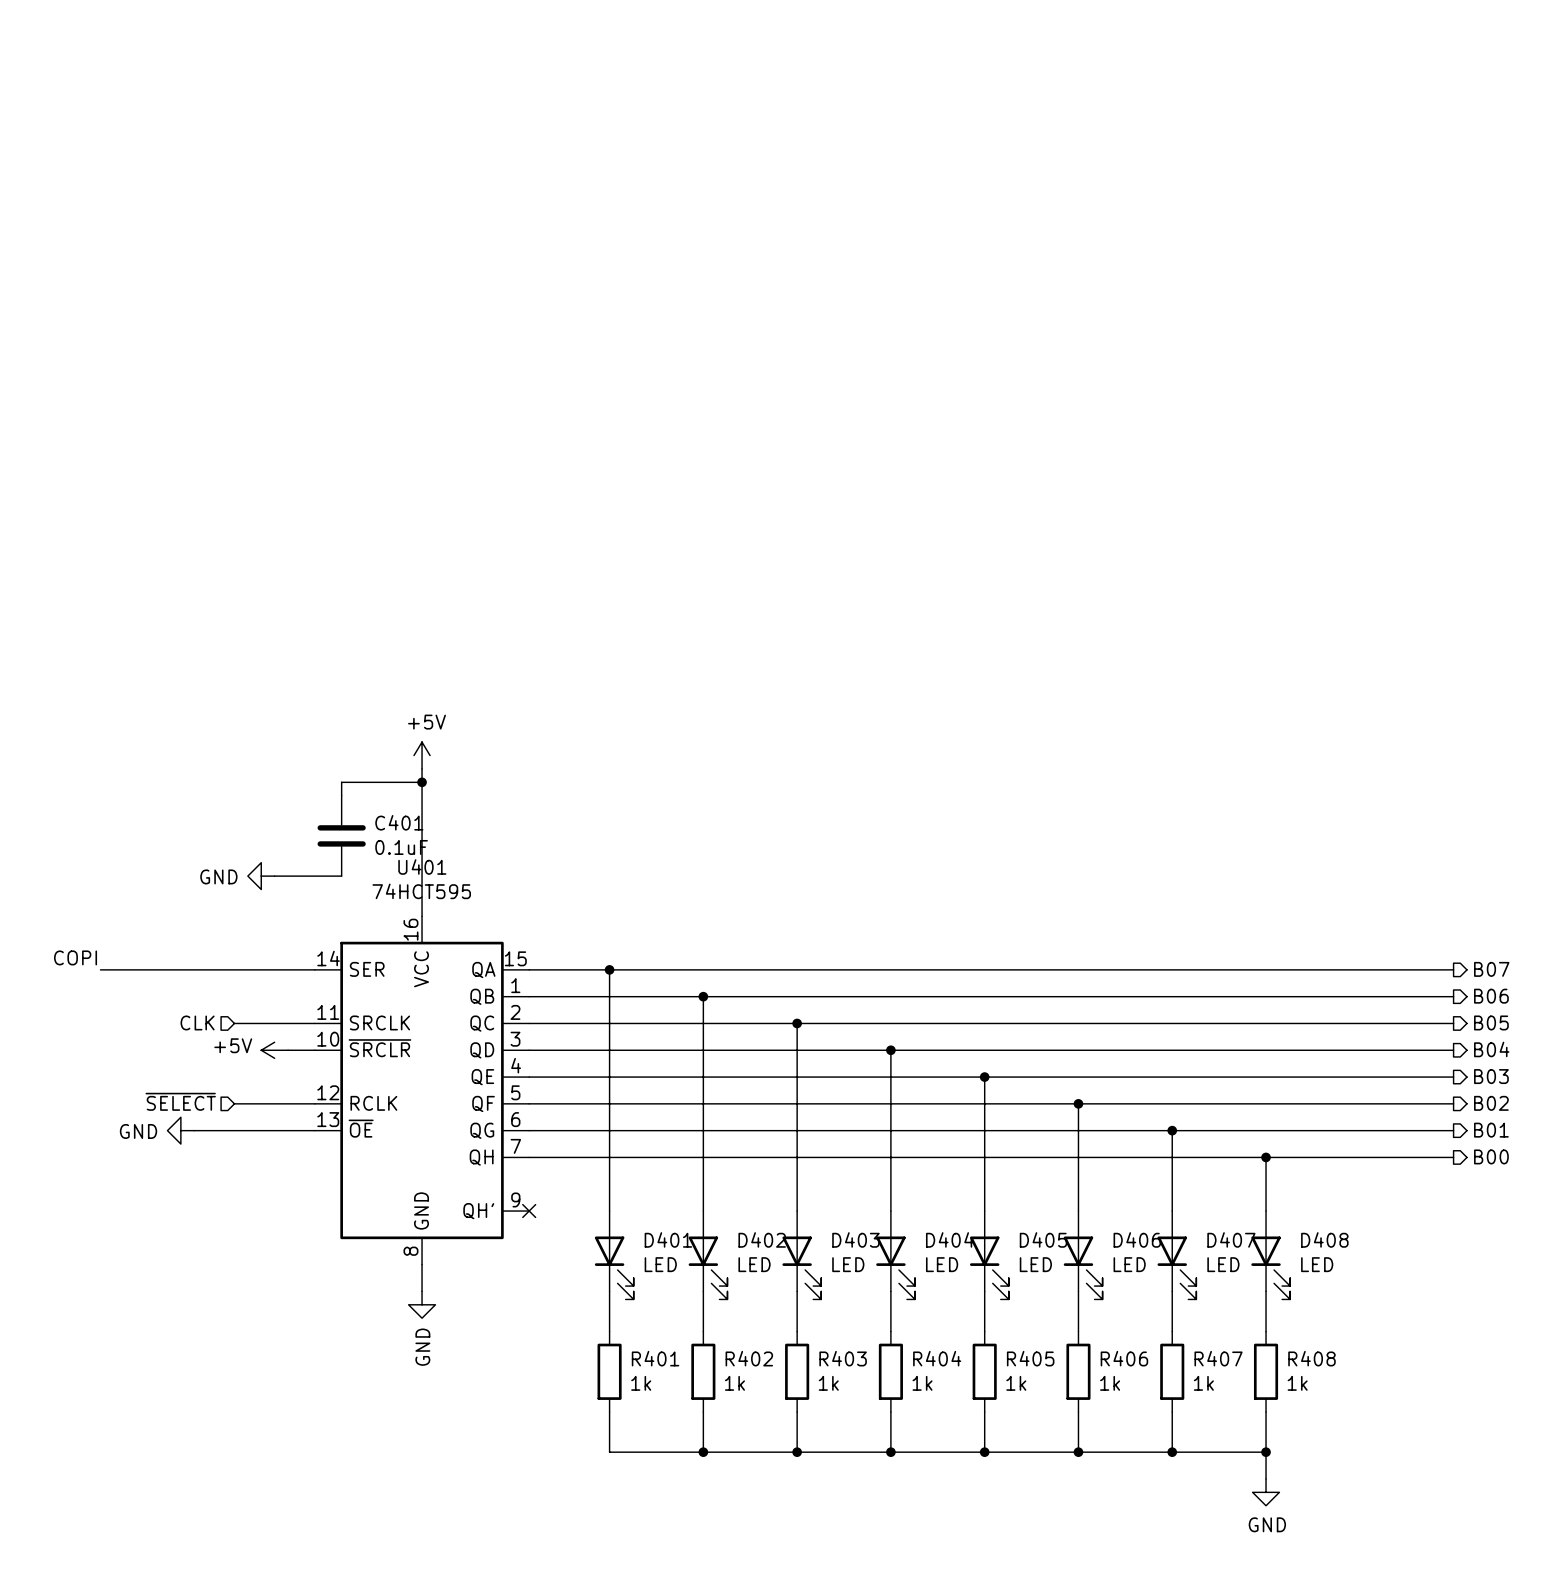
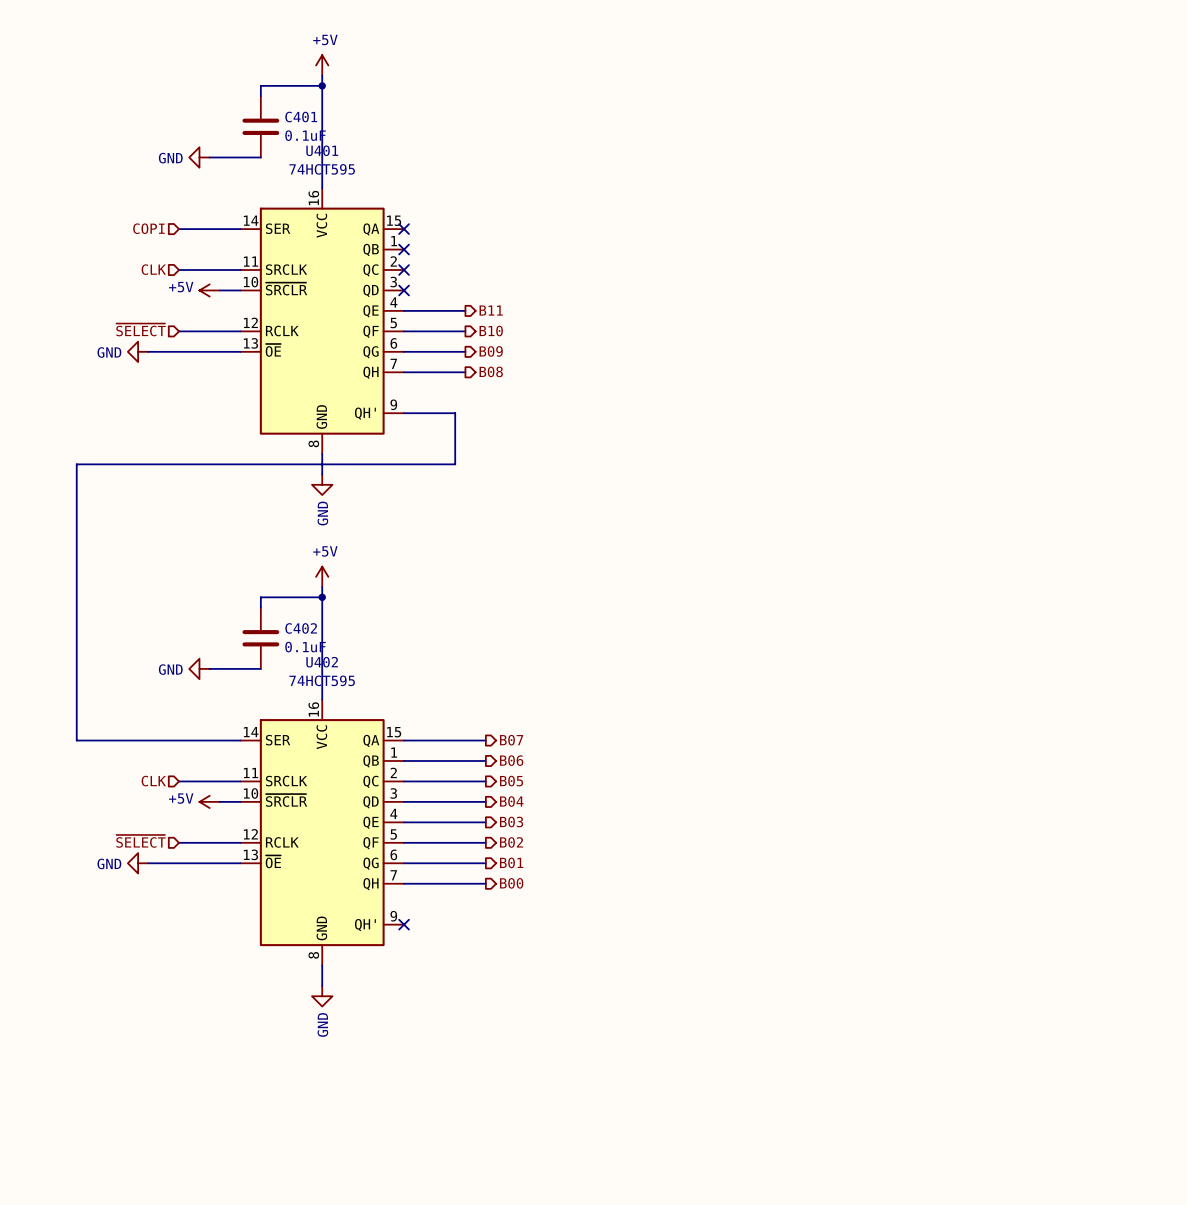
power symbol: none -> +5V (322, 65)
wire: none -> (322, 75) (322, 188)
wire: none -> (322, 85) (260, 85) (260, 96)
junction: none -> (322, 85)
C401: none -> 0.1uF (260, 126)
power symbol: none -> GND (199, 157)
wire: none -> (209, 157) (260, 157)
hierarchical label: none -> COPI (148, 228)
wire: none -> (179, 229) (240, 229)
no-connect mark: none -> (404, 229)
no-connect mark: none -> (404, 249)
hierarchical label: none -> CLK (153, 269)
wire: none -> (179, 270) (240, 270)
no-connect mark: none -> (404, 270)
power symbol: none -> +5V (209, 290)
wire: none -> (219, 290) (240, 290)
no-connect mark: none -> (404, 290)
hierarchical label: none -> B11 (491, 310)
wire: none -> (404, 310) (465, 310)
U401: none -> 74HCT595 (322, 321)
hierarchical label: none -> ~{SELECT} (141, 329)
hierarchical label: none -> B10 (491, 331)
wire: none -> (179, 331) (240, 331)
wire: none -> (404, 331) (465, 331)
power symbol: none -> GND (138, 351)
wire: none -> (148, 351) (240, 351)
wire: none -> (404, 351) (465, 351)
hierarchical label: none -> B09 (491, 351)
wire: none -> (404, 372) (465, 372)
hierarchical label: none -> B08 (491, 371)
wire: none -> (404, 413) (455, 413) (455, 464) (76, 464) (76, 740)
wire: none -> (322, 454) (322, 474)
power symbol: none -> GND (322, 484)
C401 name: C401 (399, 822) -> C402 (301, 628)
U401 name: U401 (422, 866) -> U402 (322, 662)
label: COPI (75, 957) -> none
wire: (609, 969) (609, 1211) -> none
junction: (609, 969) -> none
wire: (636, 969) (1453, 969) -> none
hierarchical label: none -> B07 (511, 740)
hierarchical label: B07 (1491, 969) -> none
wire: (636, 996) (1453, 996) -> none
hierarchical label: none -> B06 (511, 760)
wire: (703, 996) (703, 1211) -> none
junction: (703, 996) -> none
hierarchical label: B06 (1491, 996) -> none
hierarchical label: none -> B05 (511, 781)
hierarchical label: B05 (1491, 1022) -> none
wire: (636, 1023) (1453, 1023) -> none
wire: (797, 1023) (797, 1211) -> none
junction: (797, 1023) -> none
hierarchical label: none -> B04 (511, 801)
hierarchical label: B04 (1491, 1049) -> none
wire: (636, 1050) (1453, 1050) -> none
wire: (890, 1050) (890, 1211) -> none
junction: (890, 1050) -> none
hierarchical label: none -> B03 (511, 821)
hierarchical label: B03 (1491, 1076) -> none
wire: (636, 1077) (1453, 1077) -> none
wire: (984, 1077) (984, 1211) -> none
junction: (984, 1077) -> none
wire: (636, 1103) (1453, 1103) -> none
hierarchical label: none -> B02 (511, 842)
wire: (1078, 1103) (1078, 1211) -> none
junction: (1078, 1103) -> none
hierarchical label: B02 (1491, 1103) -> none
wire: (636, 1130) (1453, 1130) -> none
hierarchical label: none -> B01 (511, 862)
wire: (1172, 1130) (1172, 1211) -> none
junction: (1172, 1130) -> none
hierarchical label: B01 (1491, 1130) -> none
hierarchical label: none -> B00 (511, 883)
hierarchical label: B00 (1491, 1156) -> none
wire: (636, 1157) (1453, 1157) -> none
wire: (1266, 1157) (1266, 1211) -> none
junction: (1266, 1157) -> none
D401: LED (614, 1255) -> none
D402: LED (708, 1255) -> none
D403: LED (801, 1255) -> none
D404: LED (895, 1255) -> none
D405: LED (989, 1255) -> none
D406: LED (1083, 1255) -> none
D407: LED (1176, 1255) -> none
D408: LED (1270, 1255) -> none
wire: (609, 1291) (609, 1331) -> none
wire: (703, 1291) (703, 1331) -> none
wire: (797, 1291) (797, 1331) -> none
wire: (890, 1291) (890, 1331) -> none
wire: (984, 1291) (984, 1331) -> none
wire: (1078, 1291) (1078, 1331) -> none
wire: (1172, 1291) (1172, 1331) -> none
wire: (1266, 1291) (1266, 1331) -> none
R401: 1k (609, 1371) -> none
R402: 1k (703, 1371) -> none
R403: 1k (797, 1371) -> none
R404: 1k (890, 1371) -> none
R405: 1k (984, 1371) -> none
R406: 1k (1078, 1371) -> none
R407: 1k (1172, 1371) -> none
R408: 1k (1266, 1371) -> none
wire: (609, 1411) (609, 1452) (1266, 1452) -> none
wire: (703, 1411) (703, 1452) -> none
wire: (797, 1411) (797, 1452) -> none
wire: (890, 1411) (890, 1452) -> none
wire: (984, 1411) (984, 1452) -> none
wire: (1078, 1411) (1078, 1452) -> none
wire: (1172, 1411) (1172, 1452) -> none
wire: (1266, 1411) (1266, 1478) -> none
junction: (703, 1452) -> none
junction: (797, 1452) -> none
junction: (890, 1452) -> none
junction: (984, 1452) -> none
junction: (1078, 1452) -> none
junction: (1172, 1452) -> none
junction: (1266, 1452) -> none
power symbol: GND (1266, 1492) -> none

